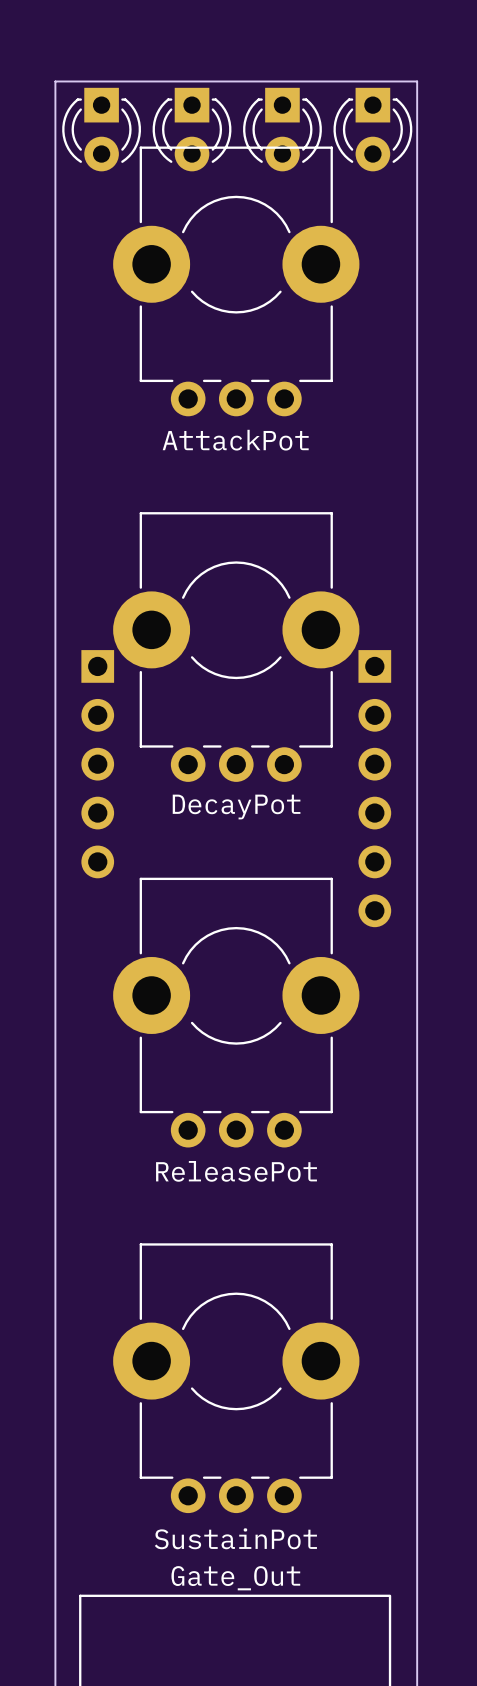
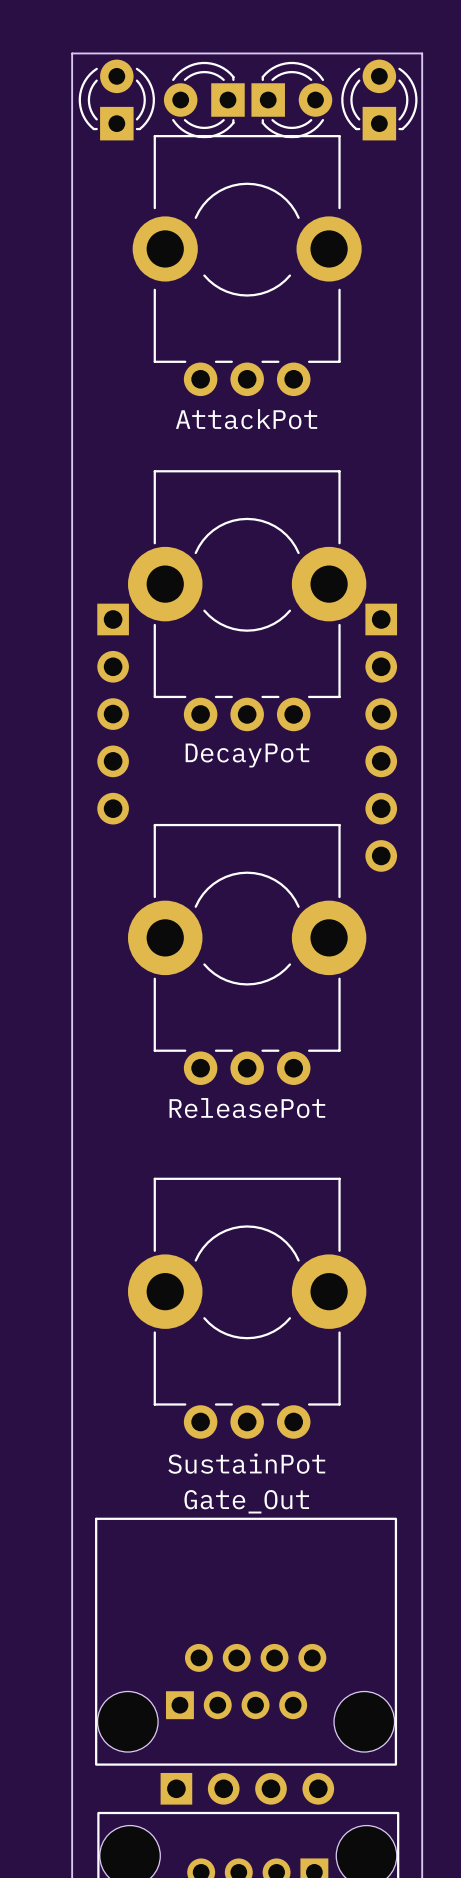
part rotation: 0° (101, 129) -> 180° (116, 100)
part rotation: 0° (192, 129) -> 90° clockwise (204, 100)
part rotation: 0° (282, 129) -> 90° counterclockwise (291, 100)
part rotation: 0° (372, 129) -> 180° (379, 100)
part footprint: [113, 146, 360, 417] -> [132, 135, 362, 397]

